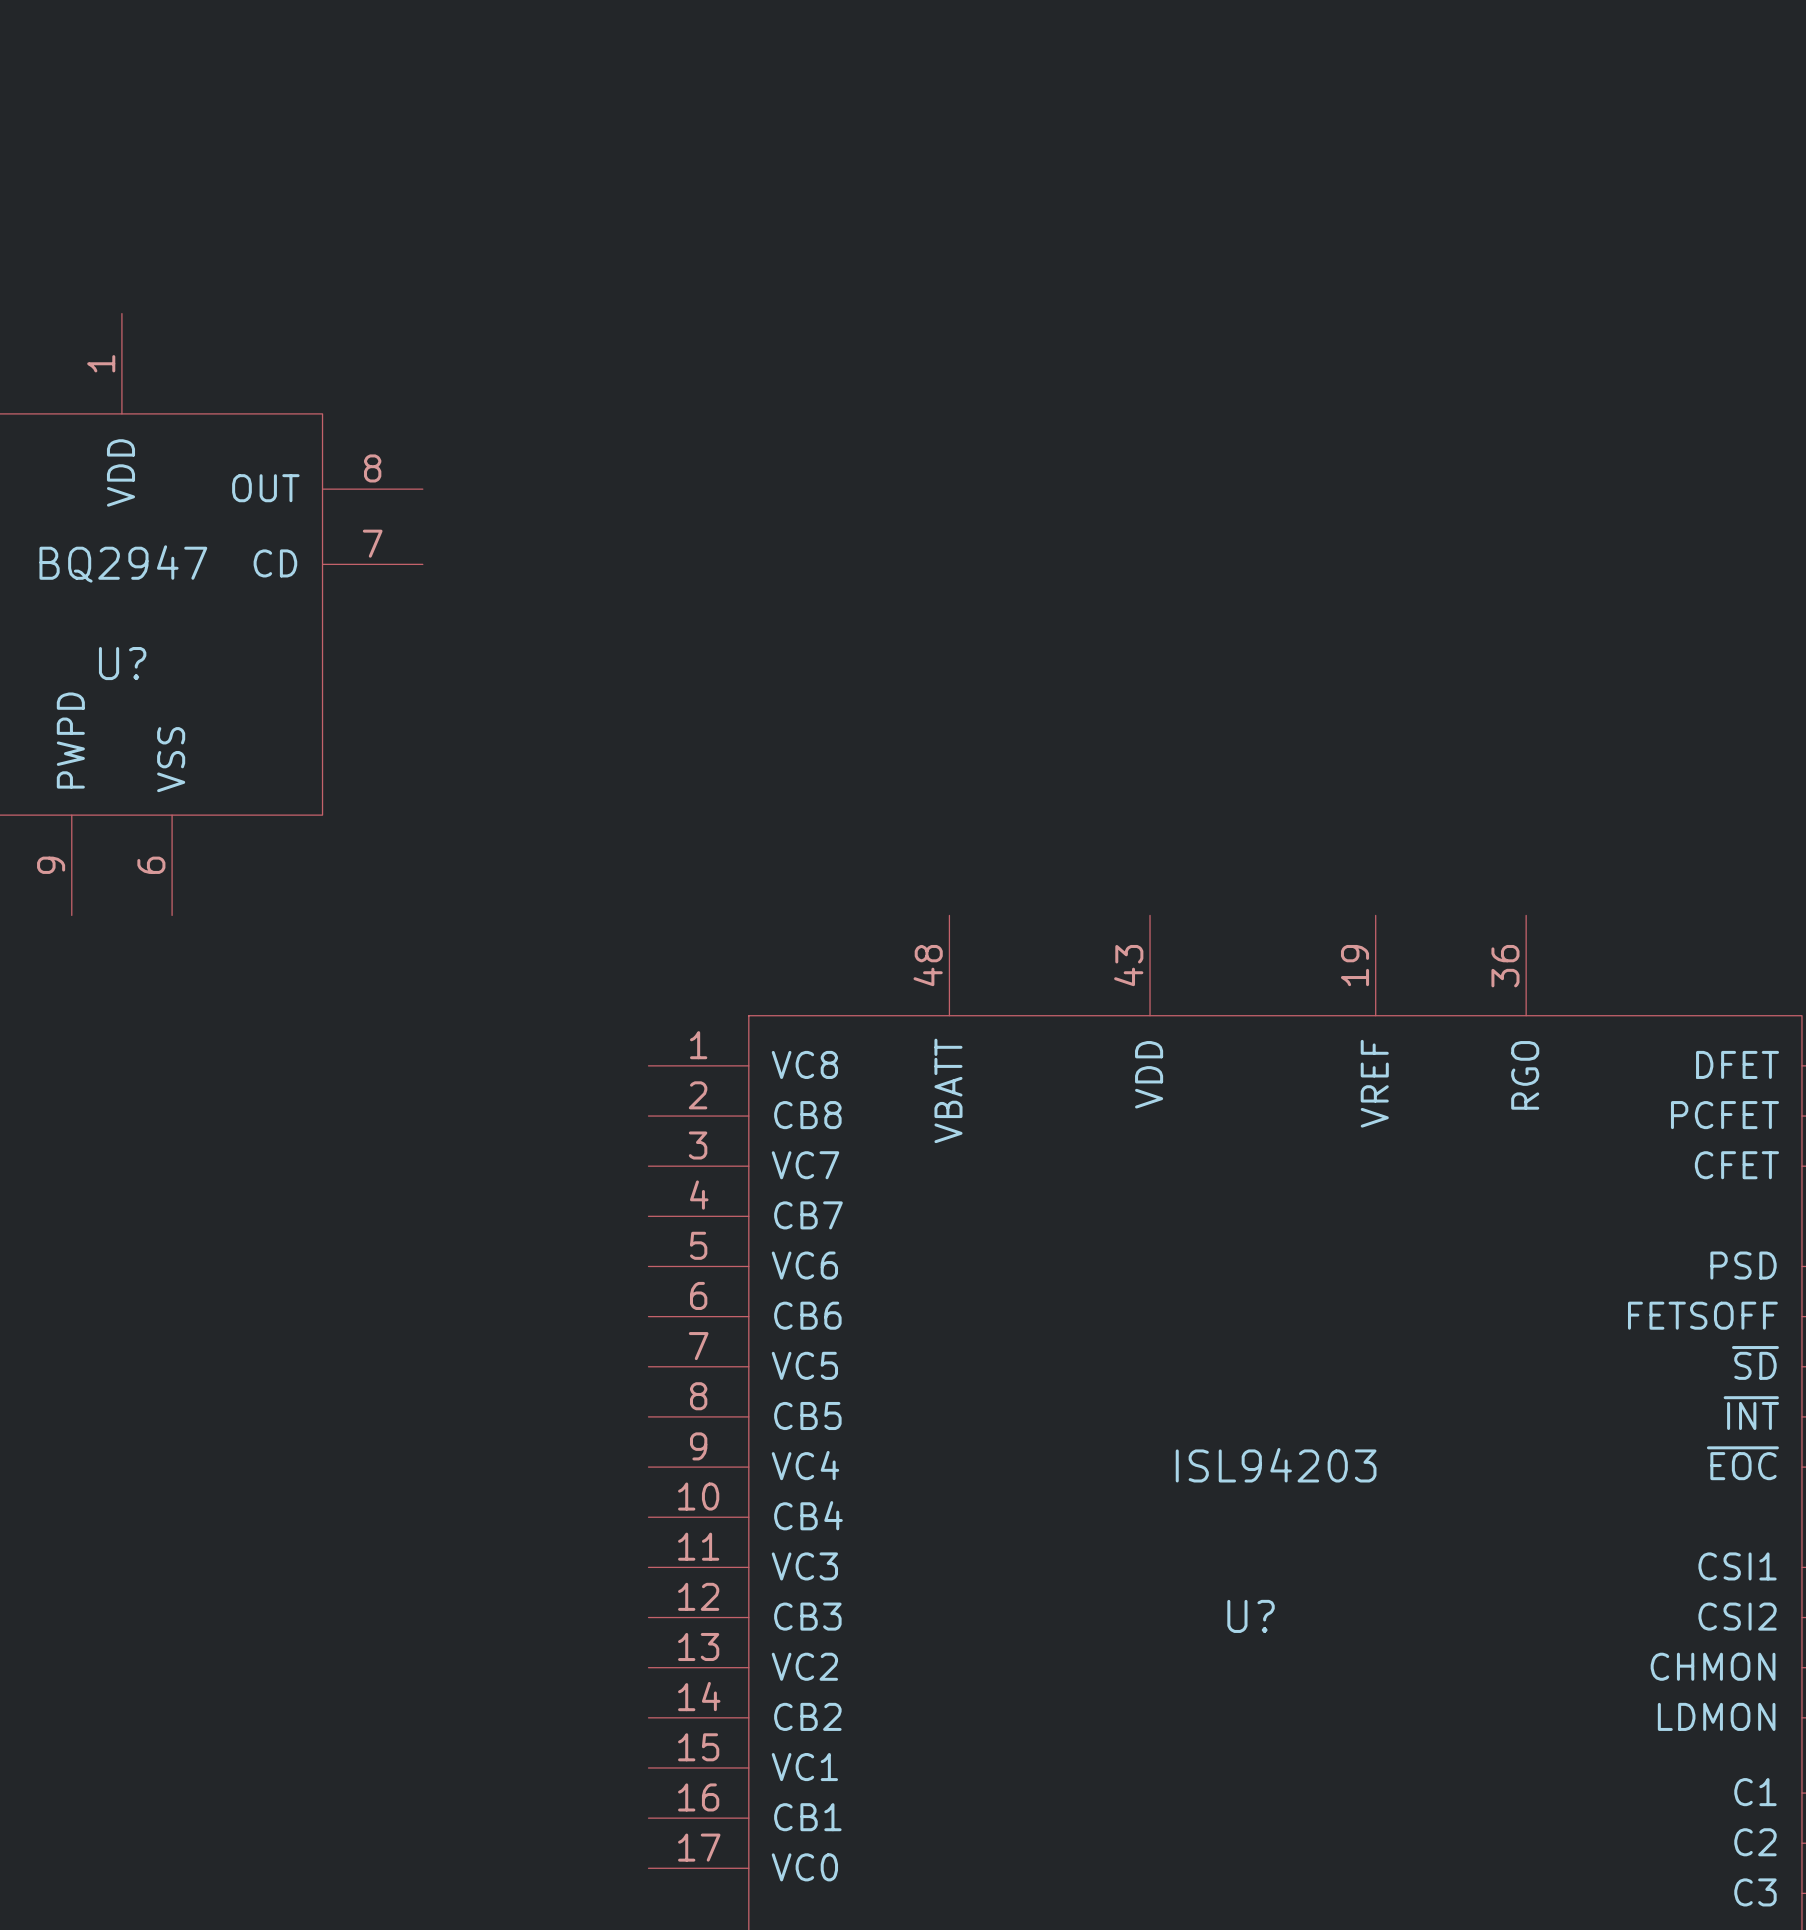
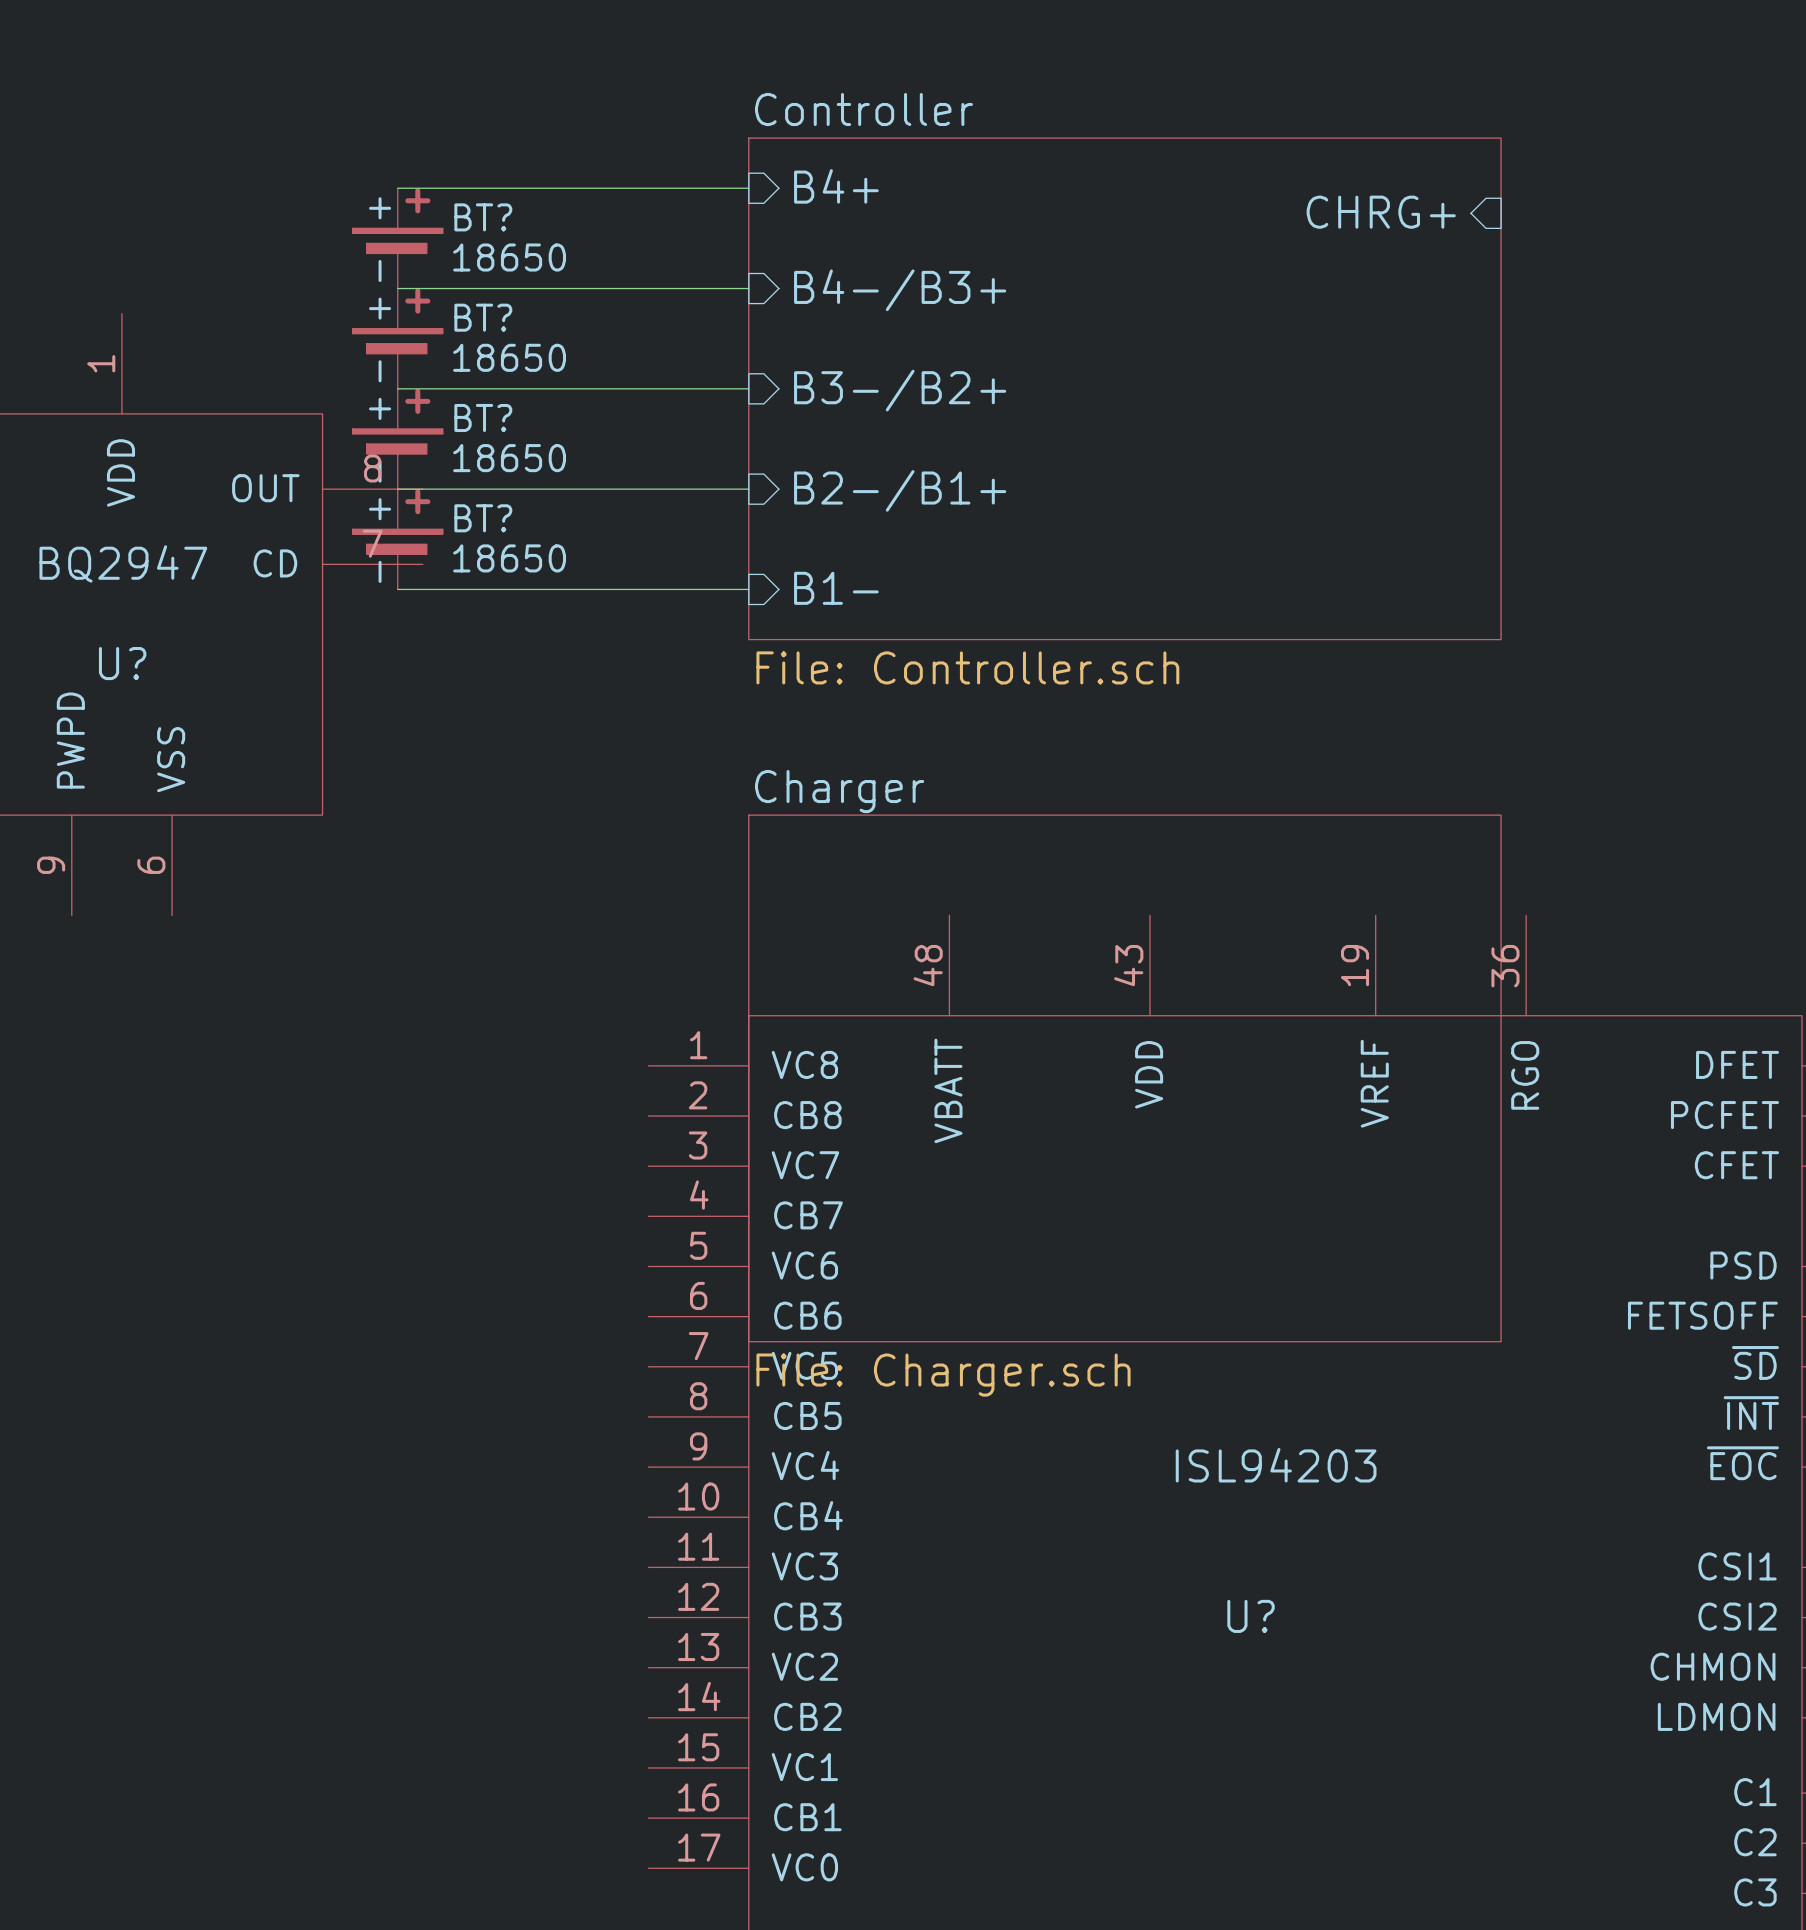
sheet pin: none -> B4+ (836, 186)
wire: none -> (397, 188) (748, 188)
sheet pin: none -> CHRG+ (1381, 212)
BT?: none -> 18650 (397, 238)
wire: none -> (397, 288) (748, 288)
sheet pin: none -> B4-/B3+ (900, 290)
BT?: none -> 18650 (397, 338)
wire: none -> (397, 388) (748, 388)
sheet Controller: none -> File: Controller.sch (1124, 388)
sheet pin: none -> B3-/B2+ (900, 390)
BT?: none -> 18650 (397, 438)
wire: none -> (397, 489) (748, 489)
sheet pin: none -> B2-/B1+ (900, 490)
BT?: none -> 18650 (397, 539)
sheet pin: none -> B1- (836, 588)
wire: none -> (397, 589) (748, 589)
sheet Charger: none -> File: Charger.sch (1124, 1078)

